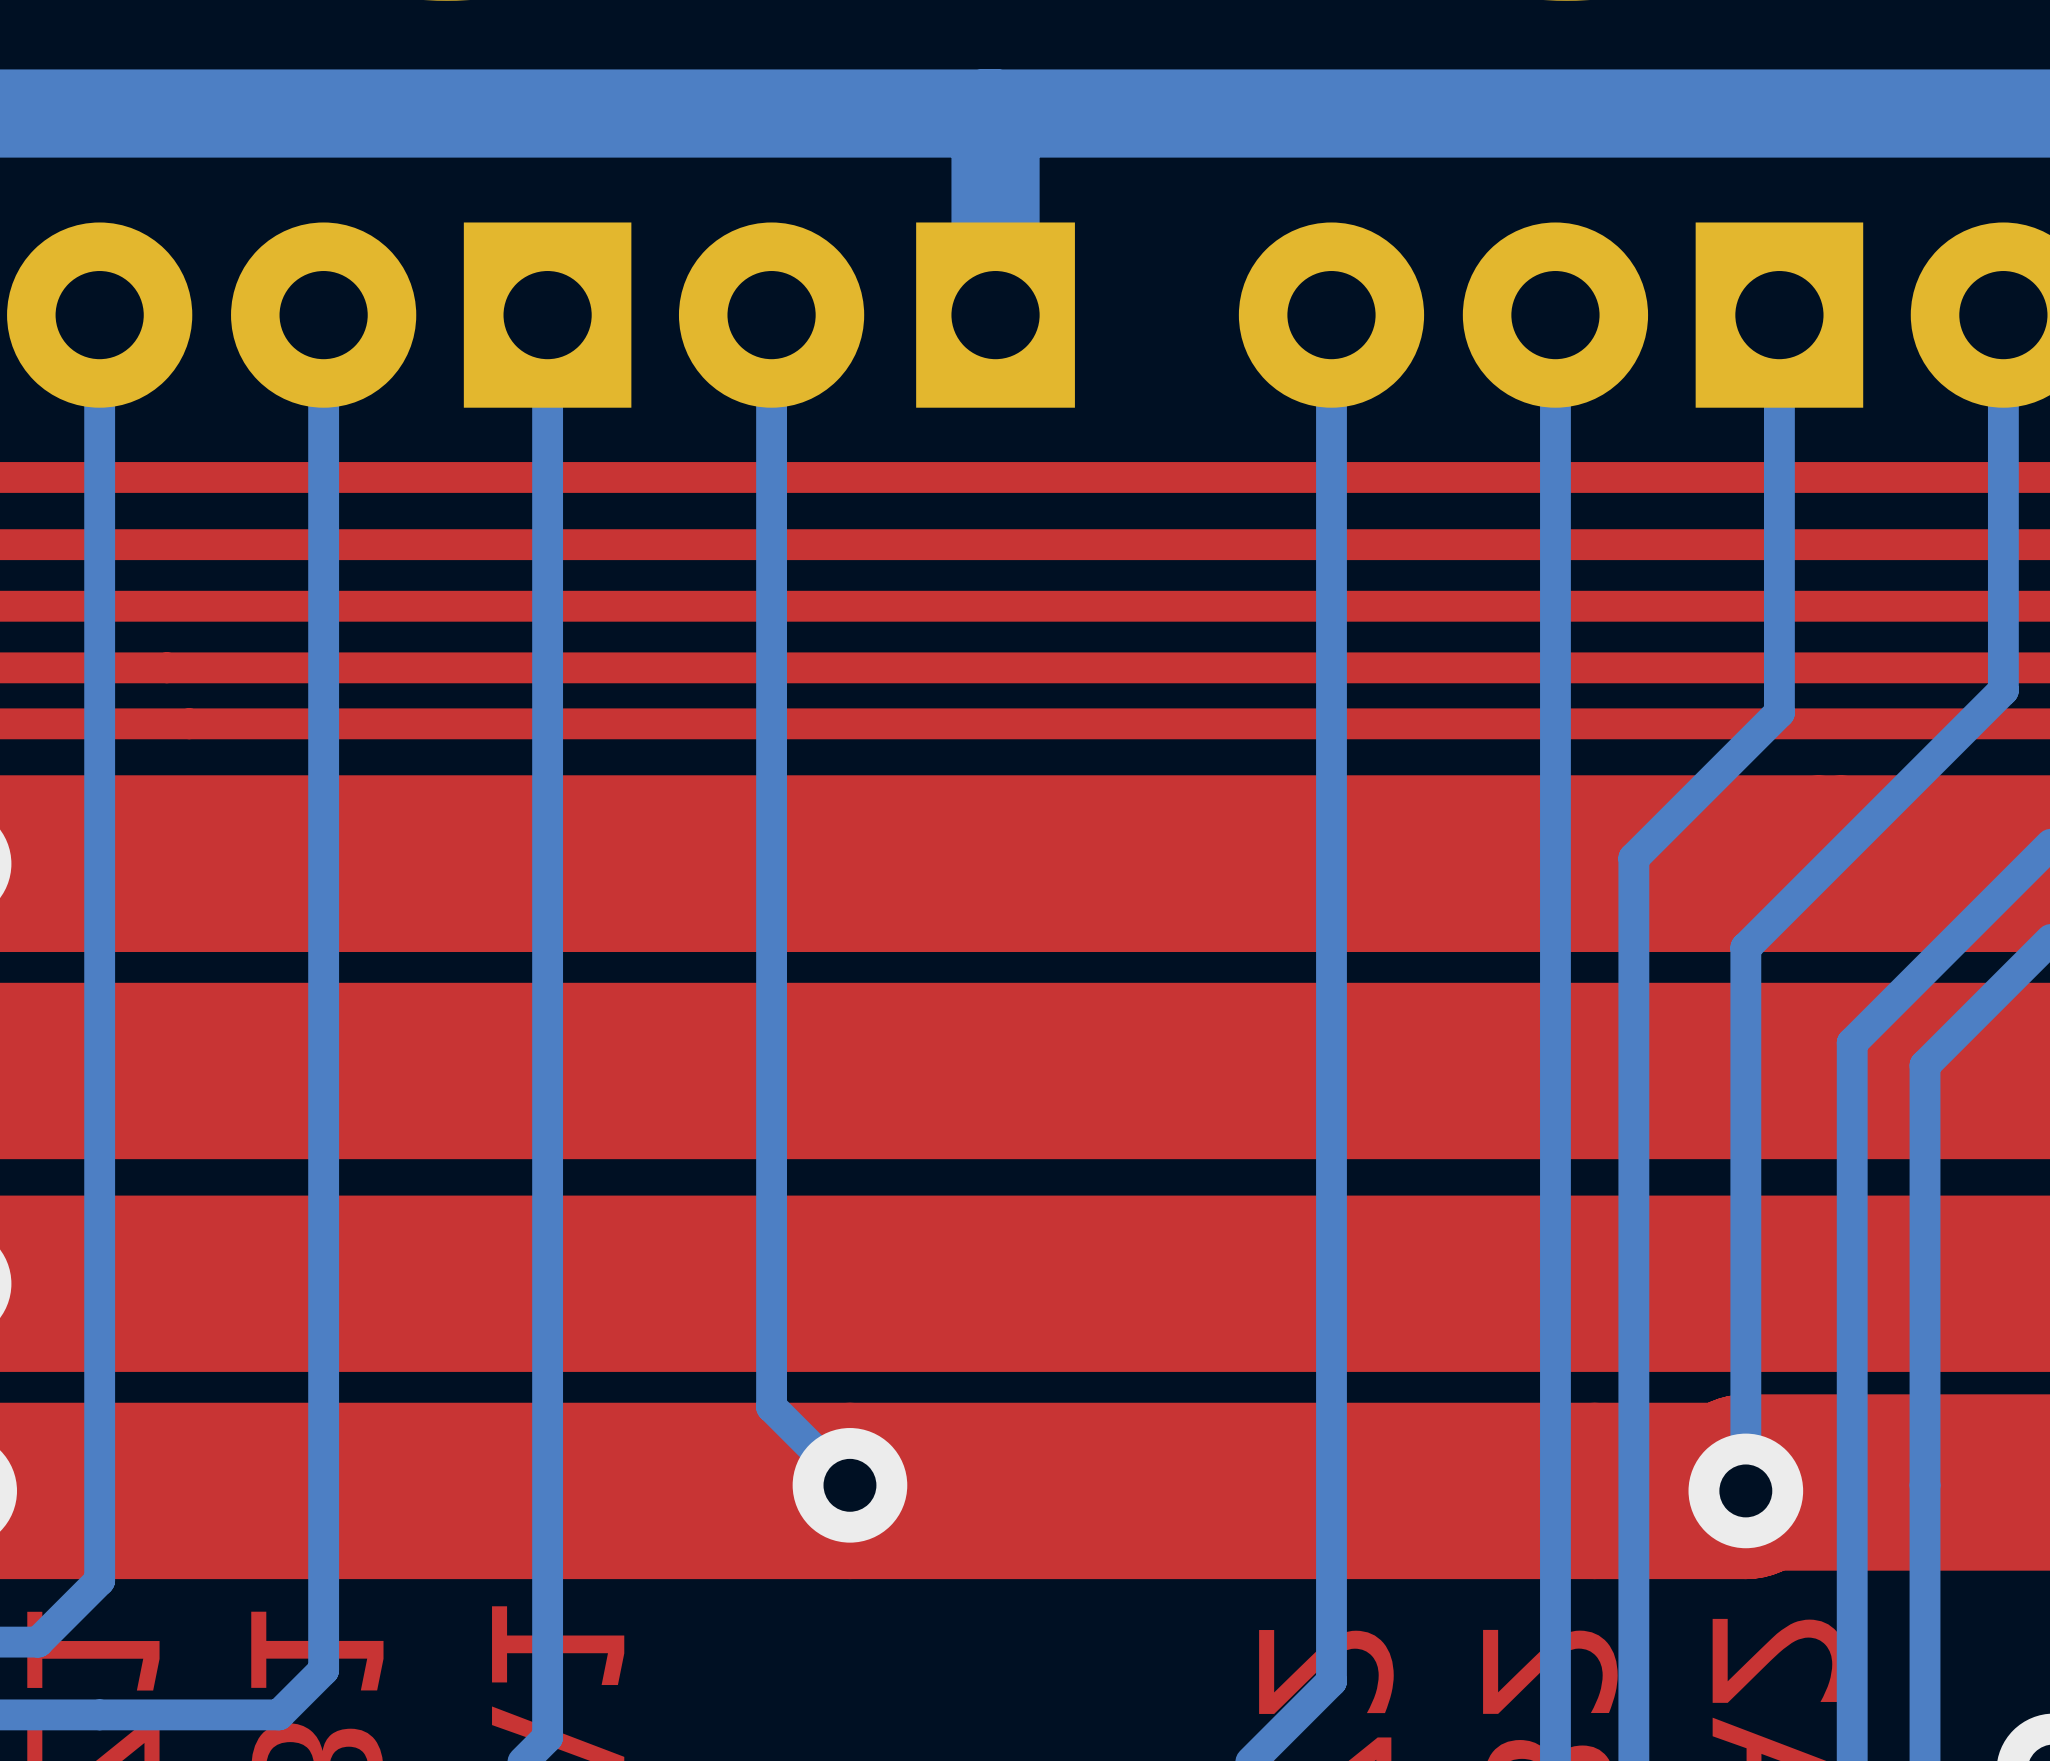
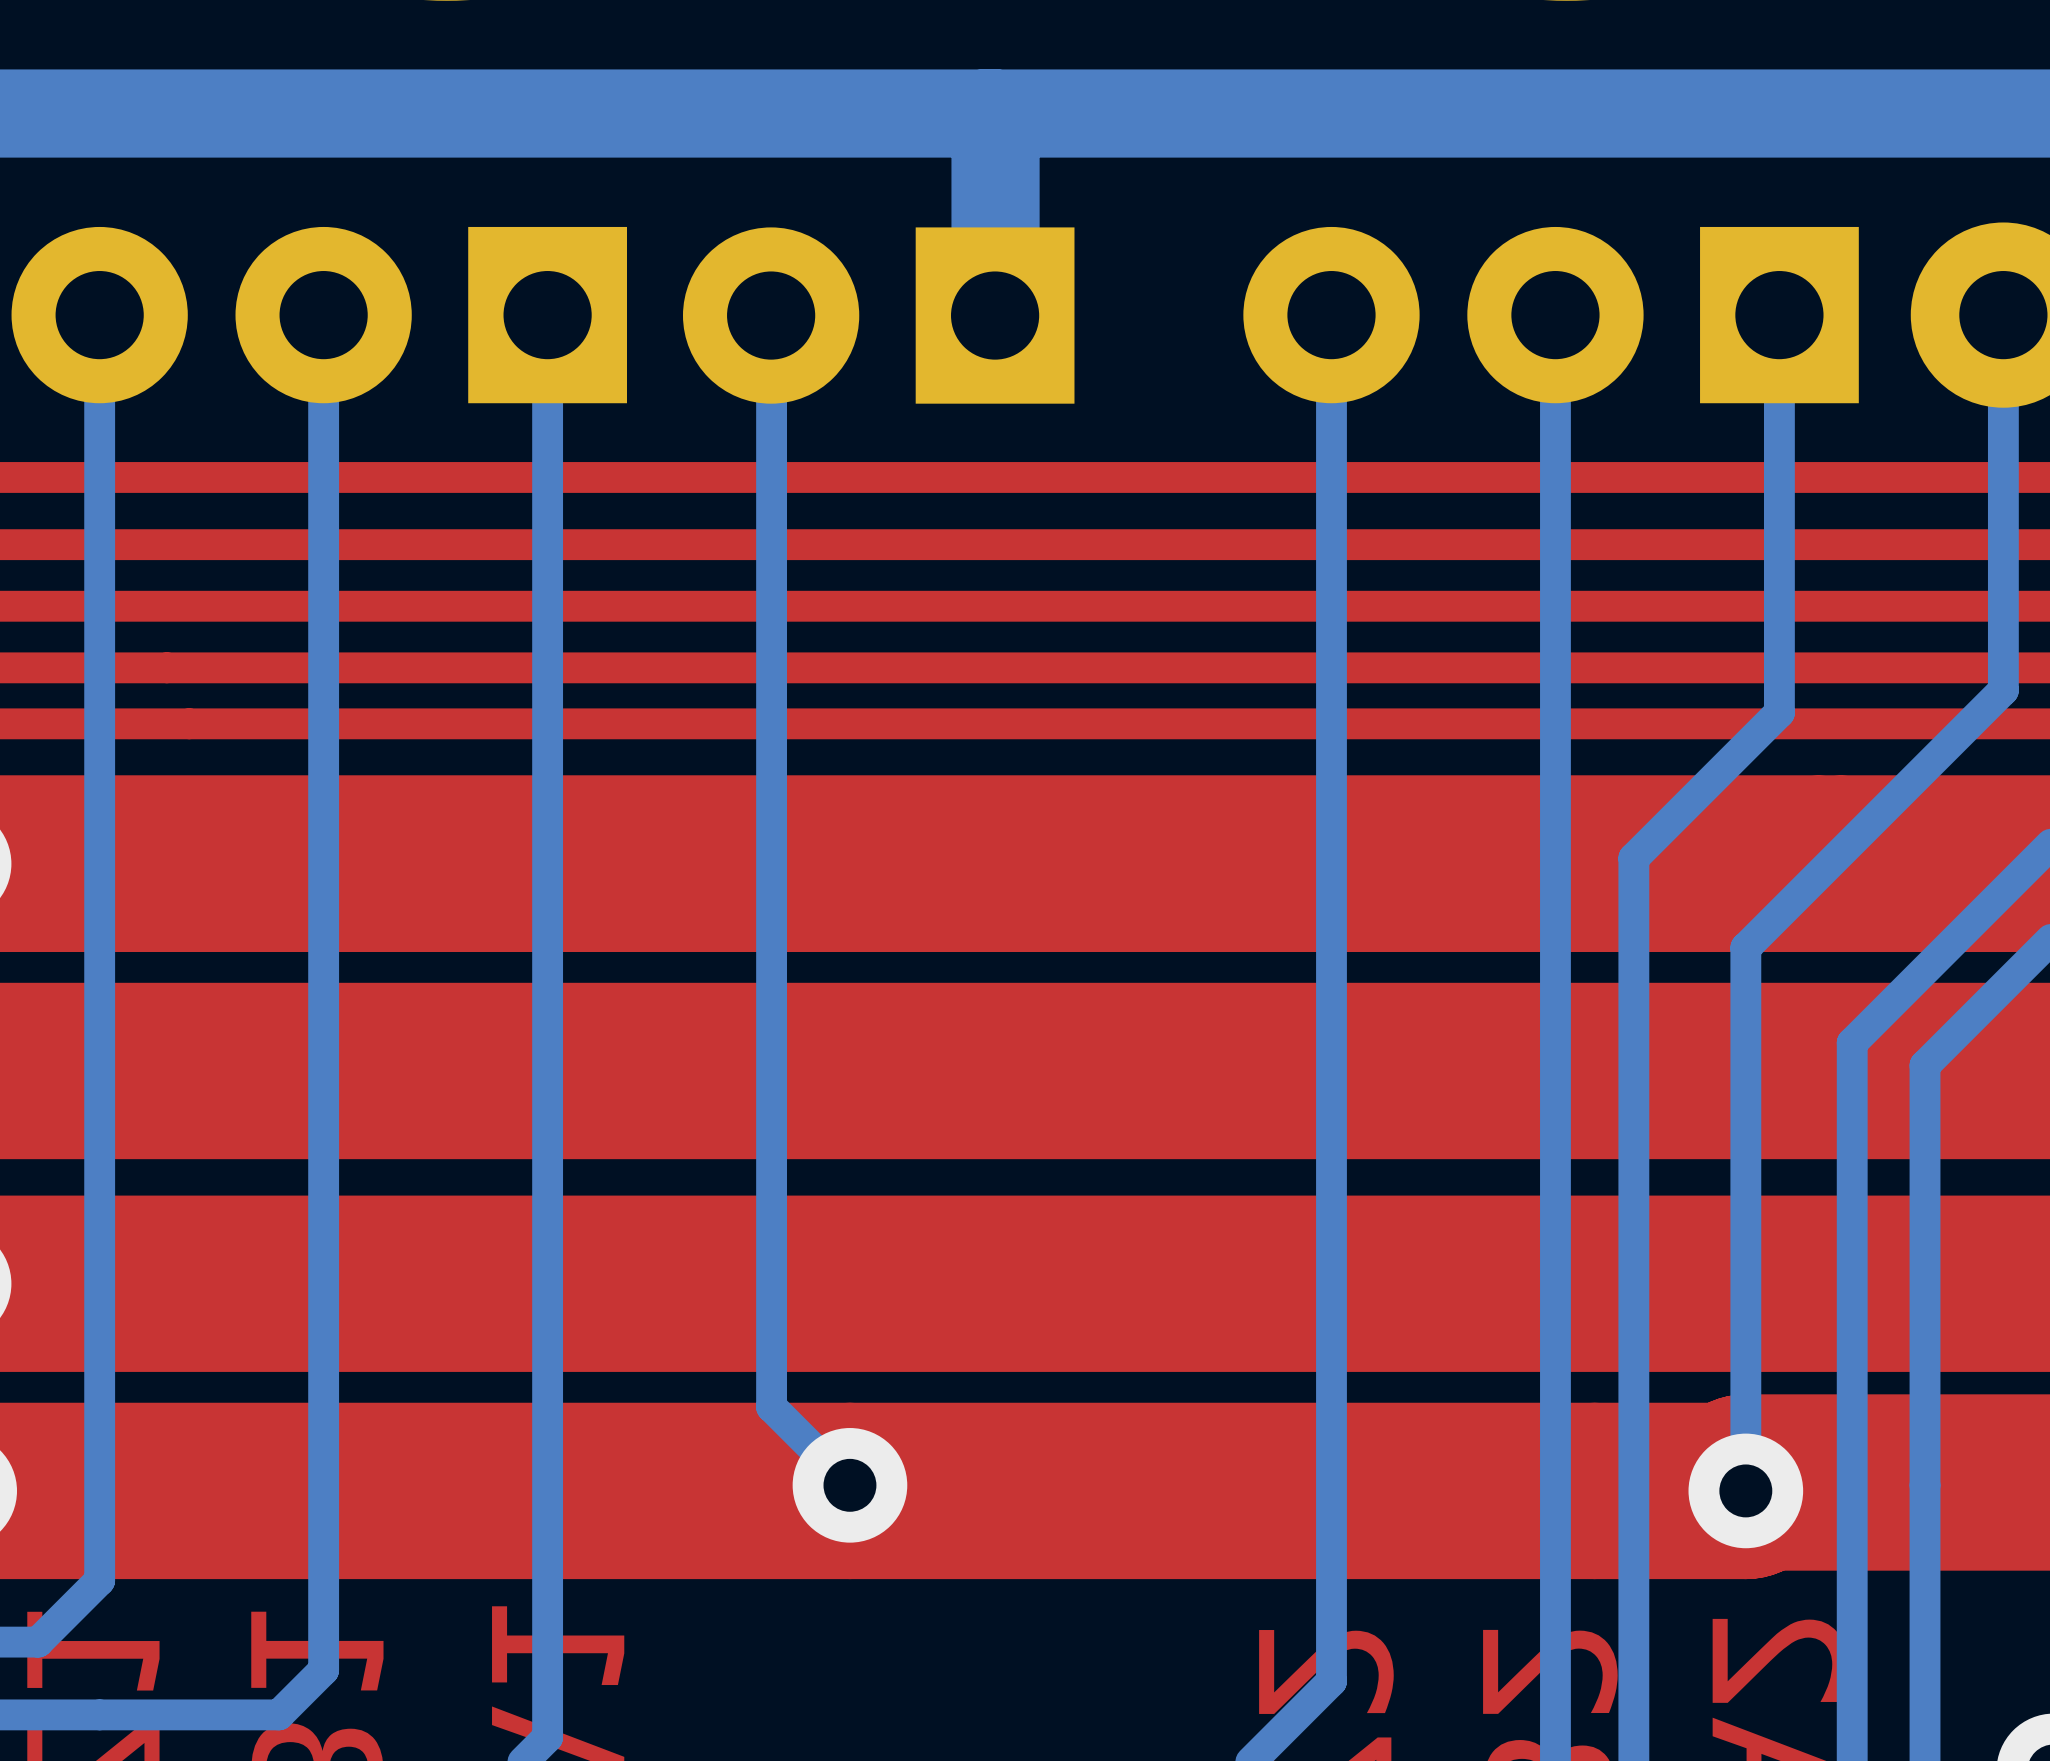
part footprint: [7, 222, 632, 408] -> [11, 226, 628, 404]
part footprint: [678, 222, 1075, 408] -> [682, 227, 1075, 404]
part footprint: [1238, 222, 1864, 408] -> [1243, 226, 1859, 404]

